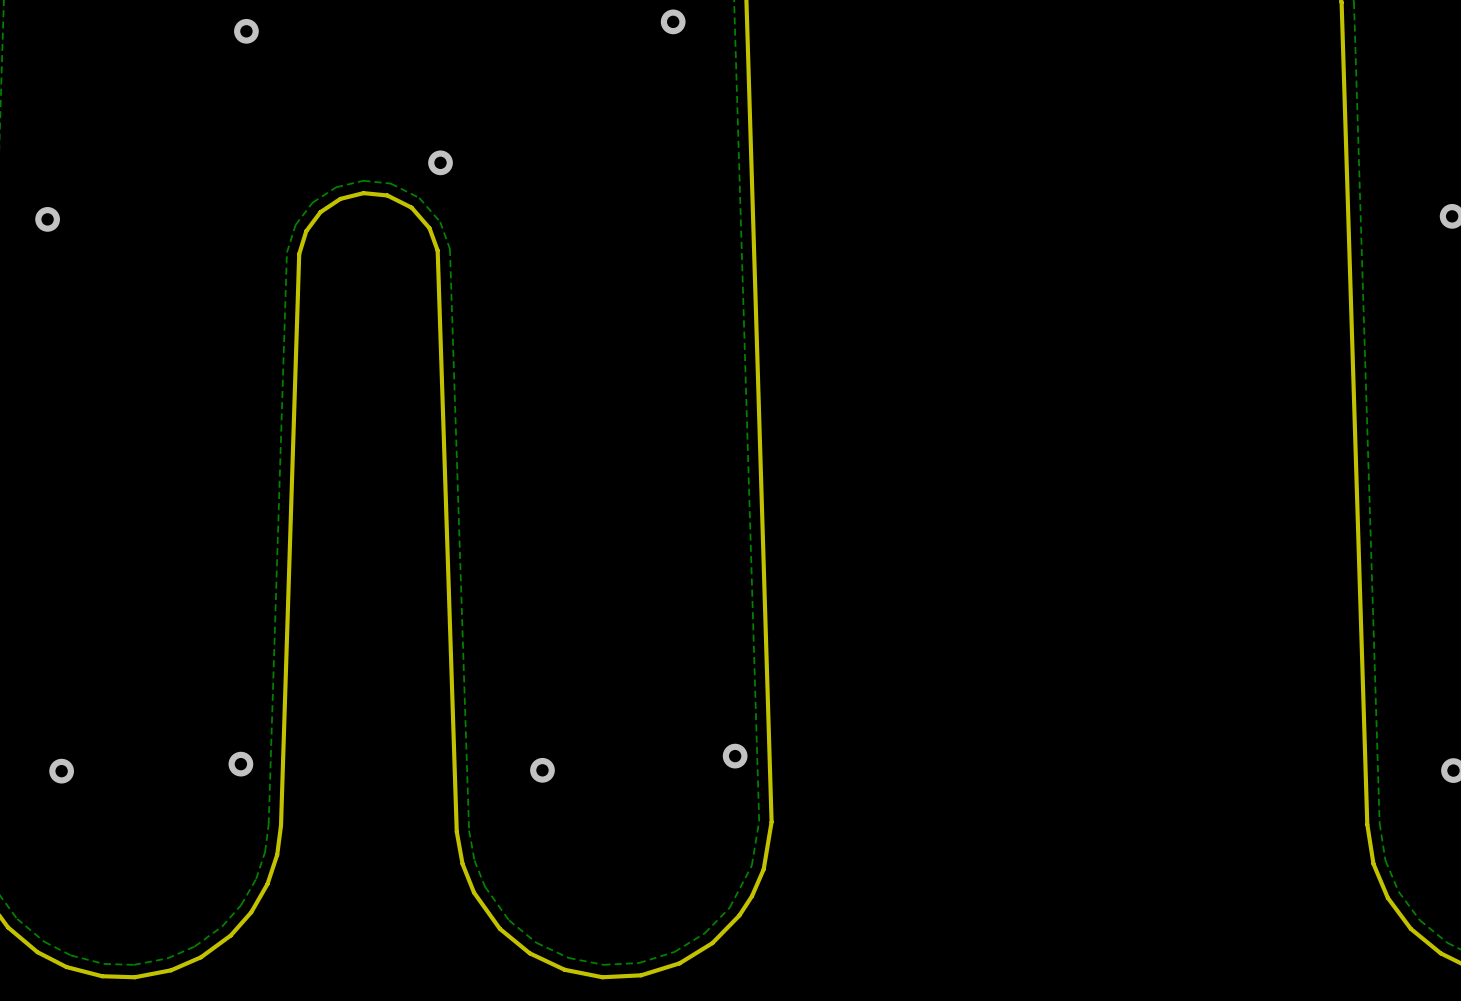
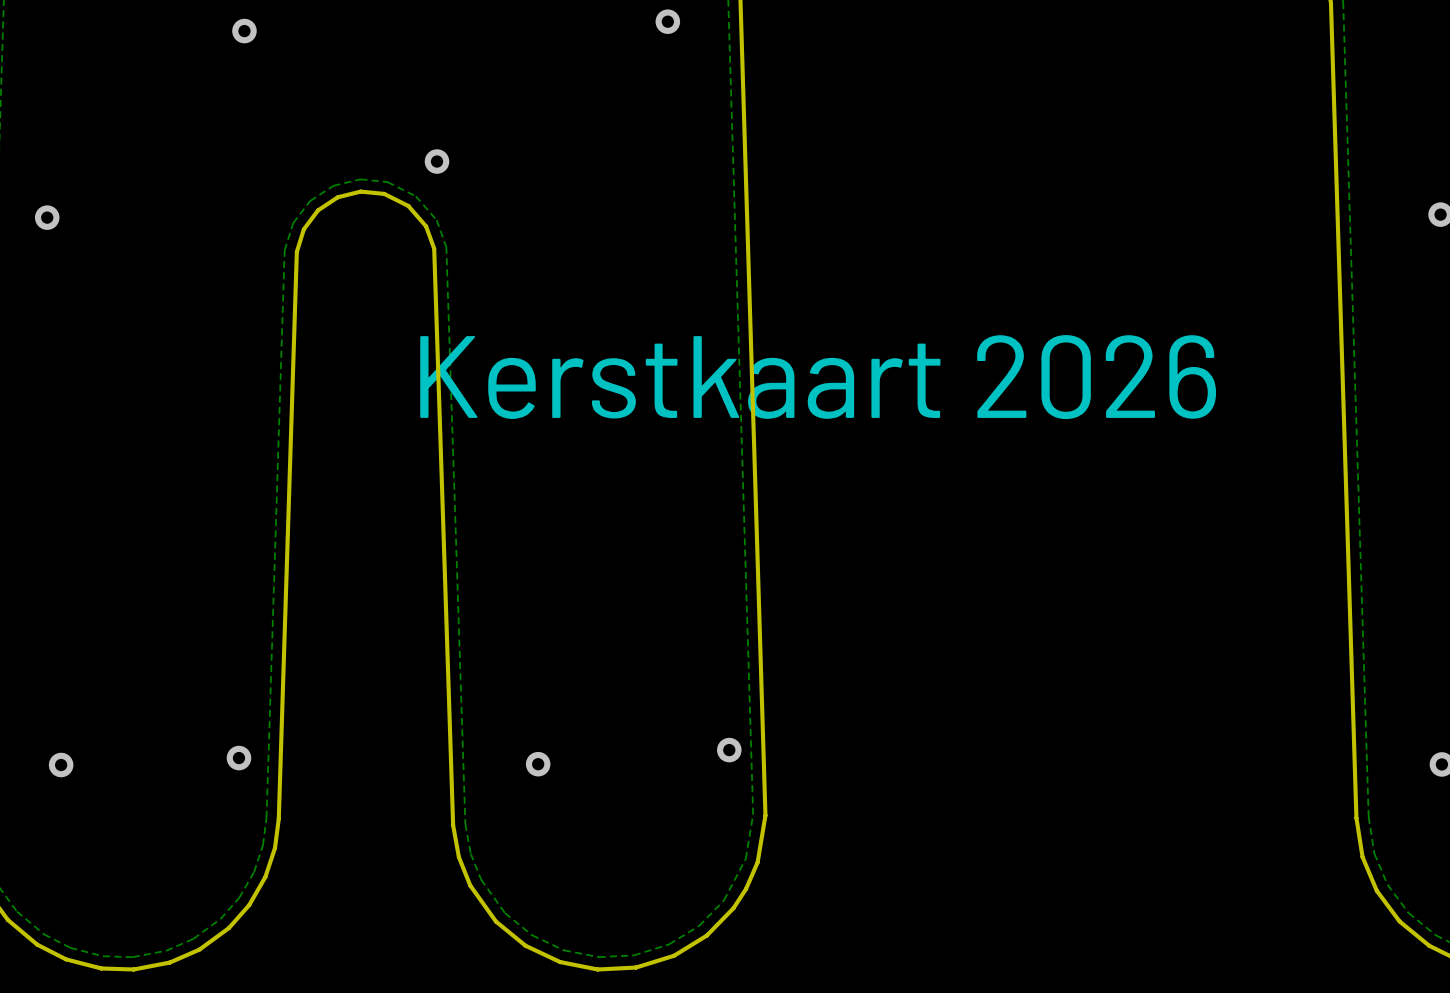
text: none -> Kerstkaart 2026 (818, 377)

